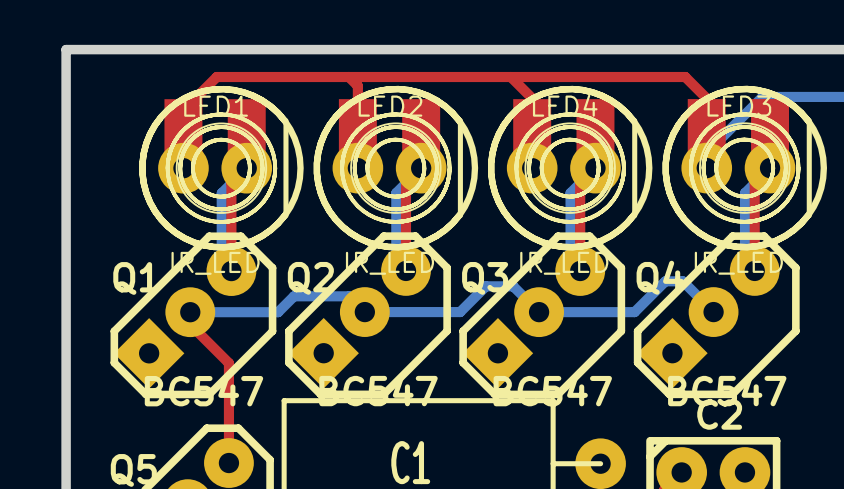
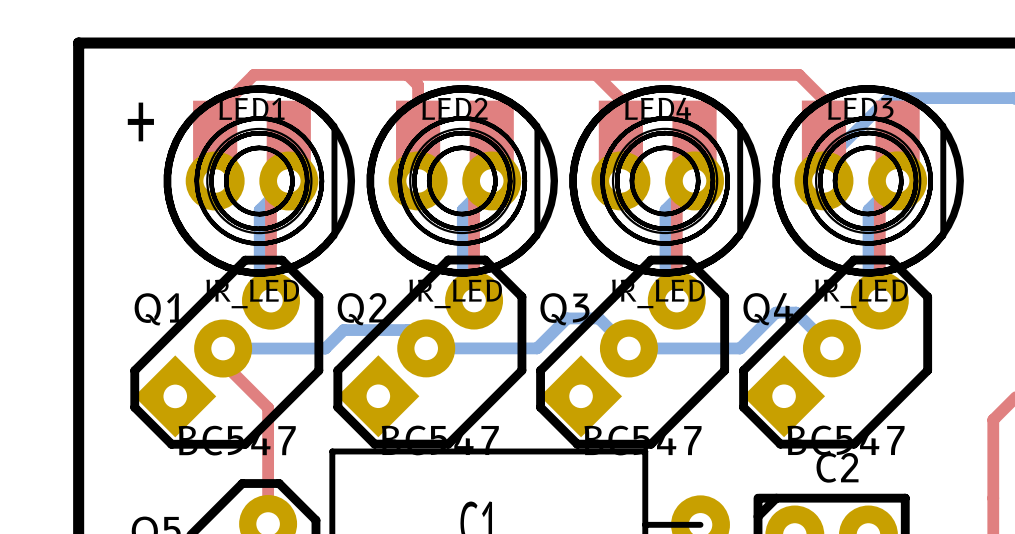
text: none -> + (140, 121)

